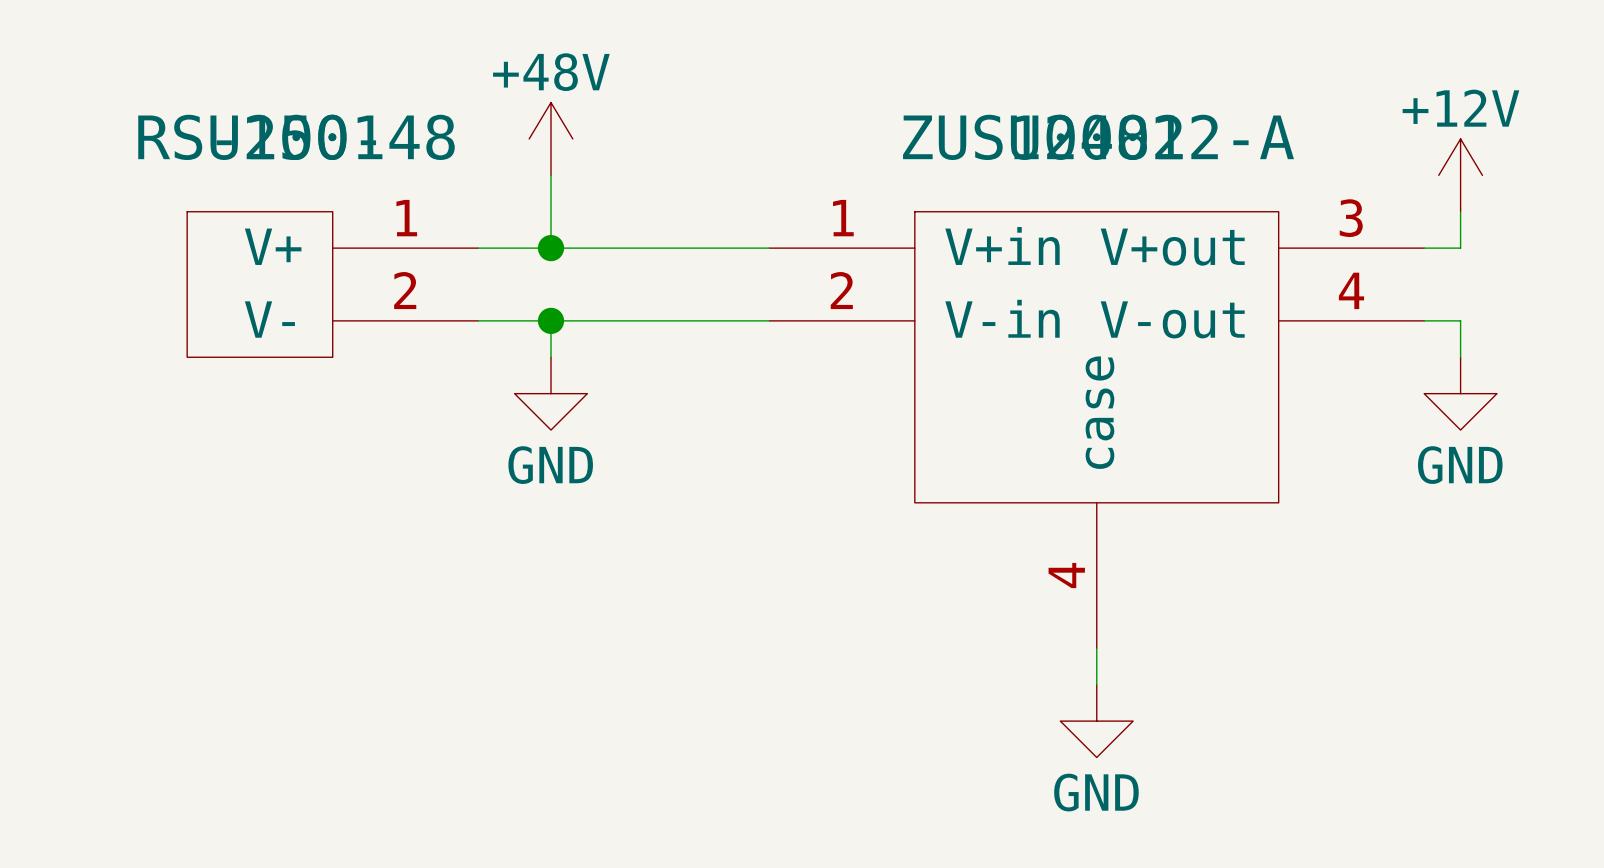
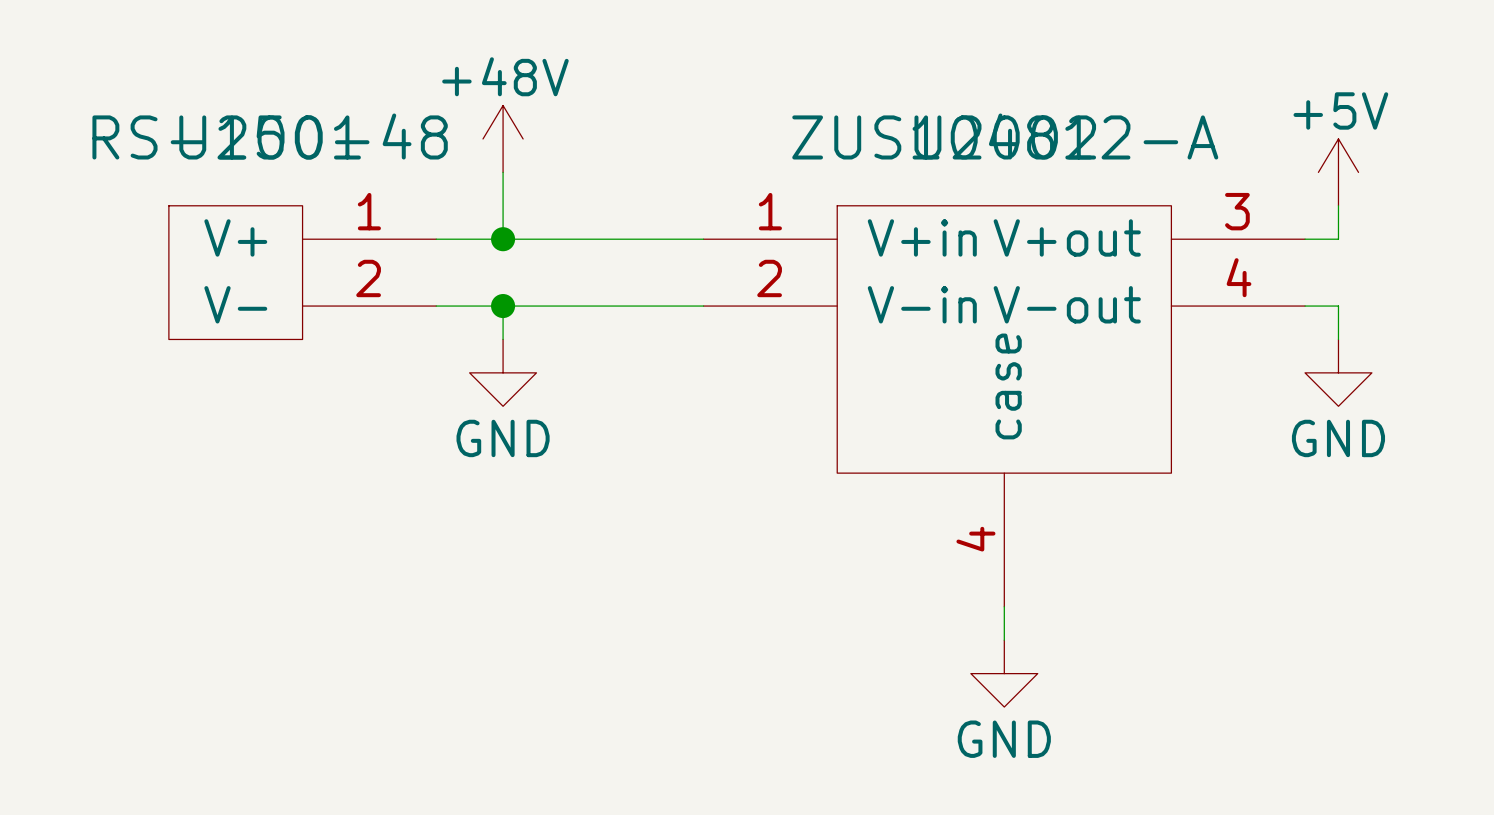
power symbol: +12V (1460, 175) -> +5V (1338, 172)

